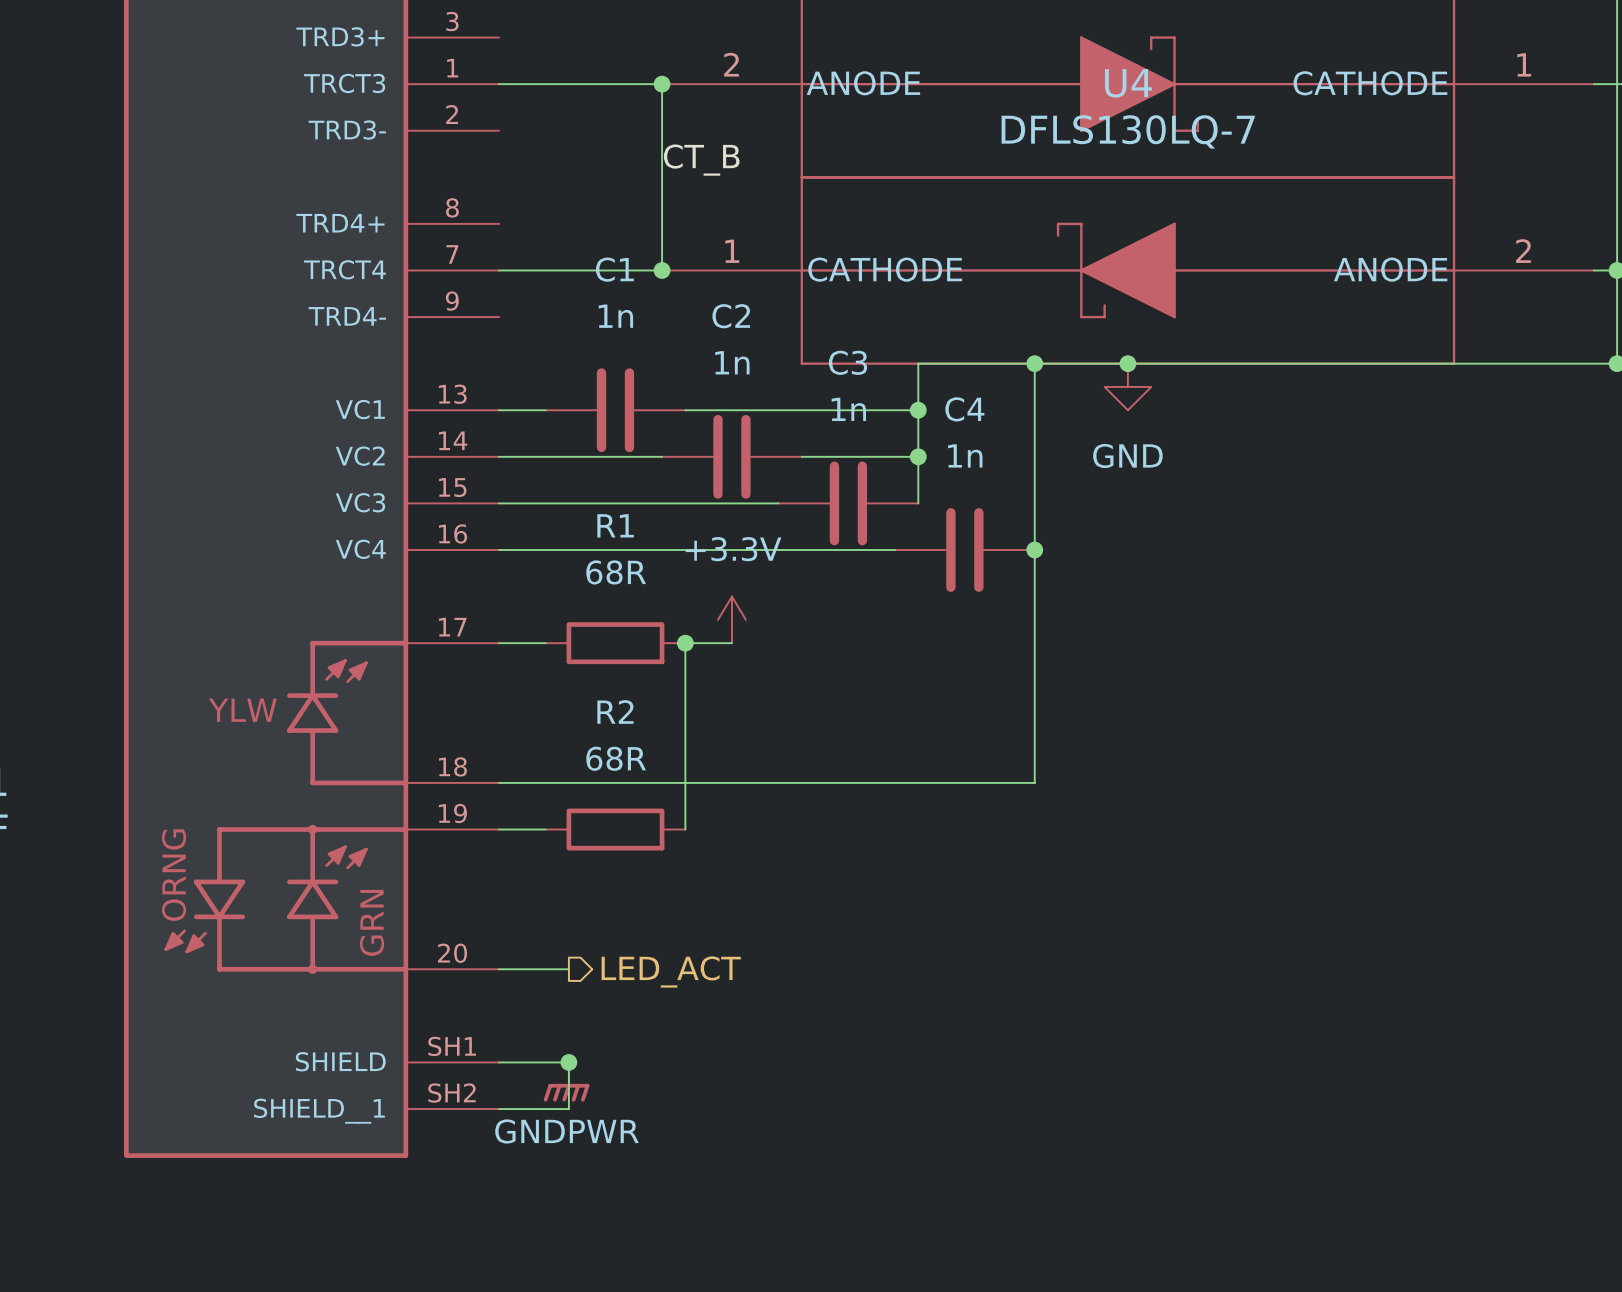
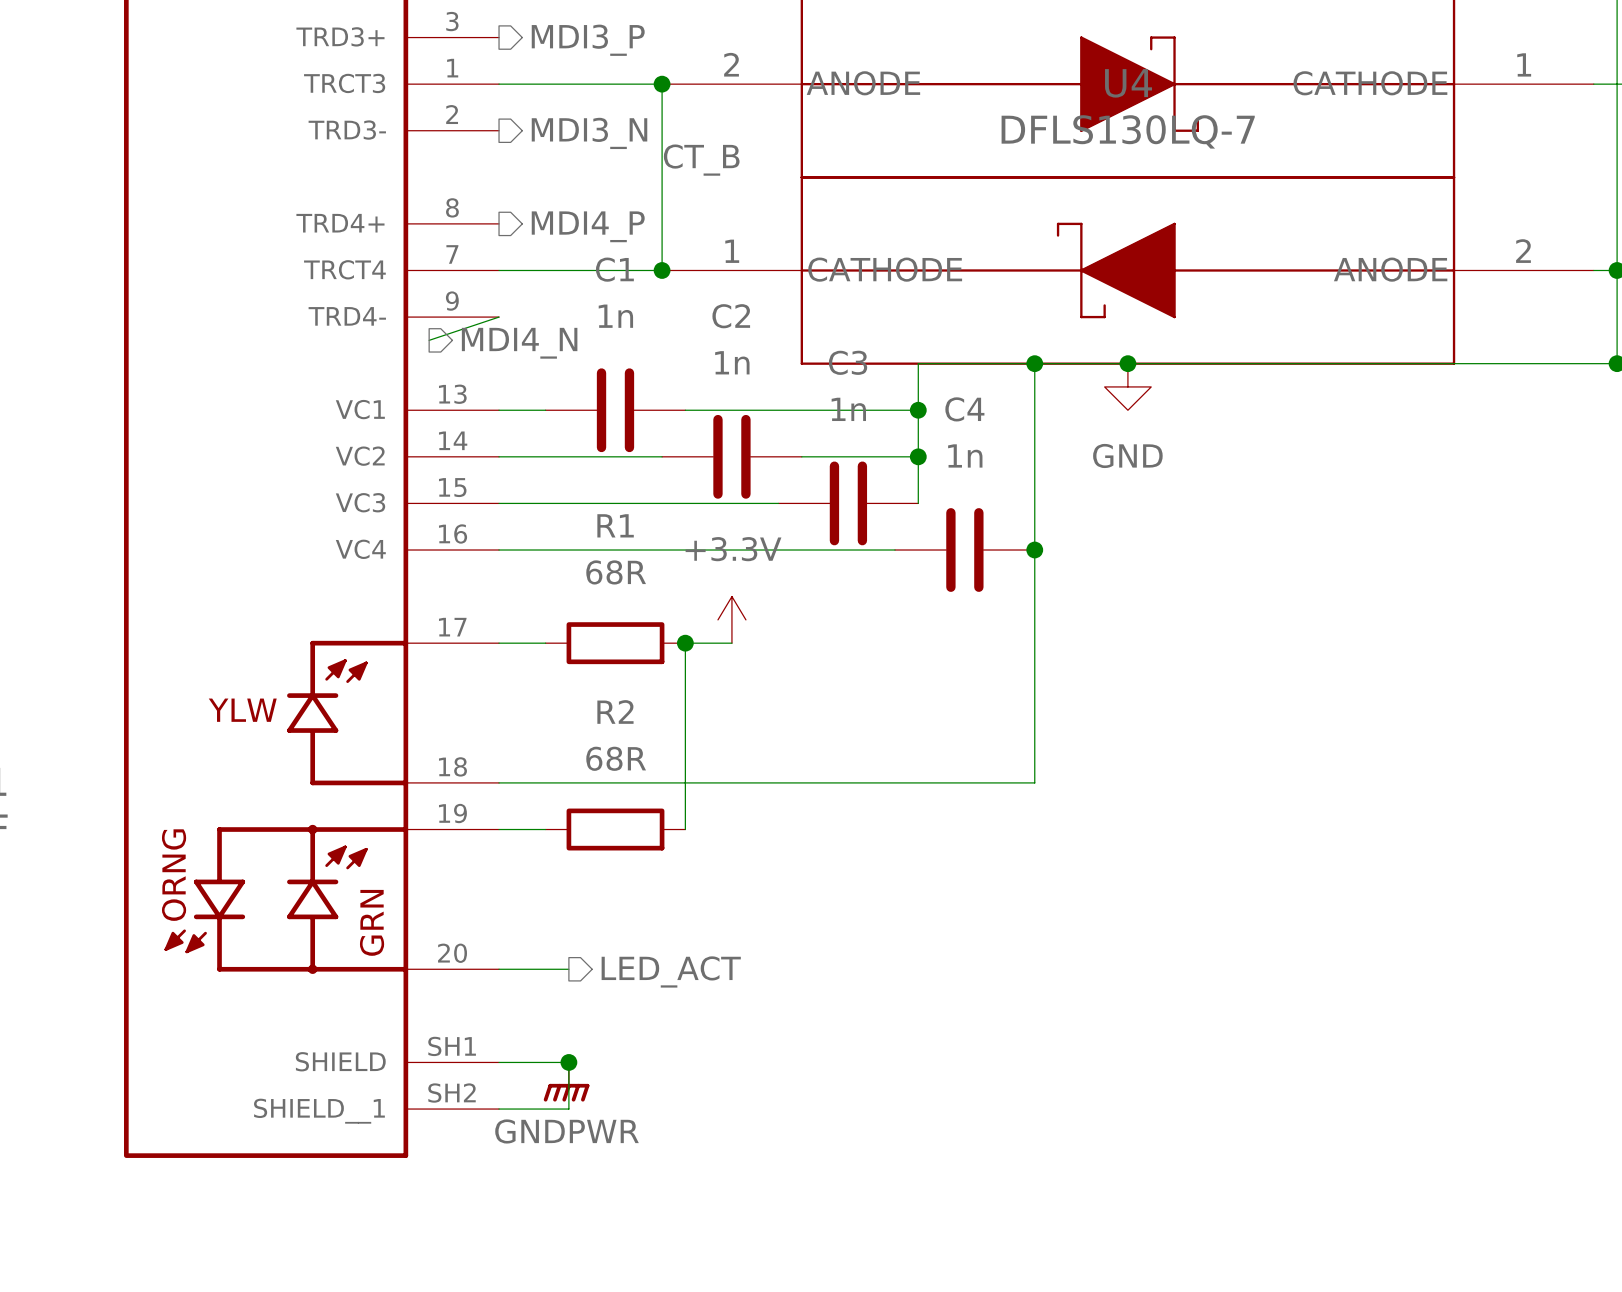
hierarchical label: none -> MDI3_P (588, 40)
hierarchical label: none -> MDI3_N (589, 133)
hierarchical label: none -> MDI4_P (588, 226)
wire: none -> (499, 317) (429, 340)
hierarchical label: none -> MDI4_N (519, 343)

